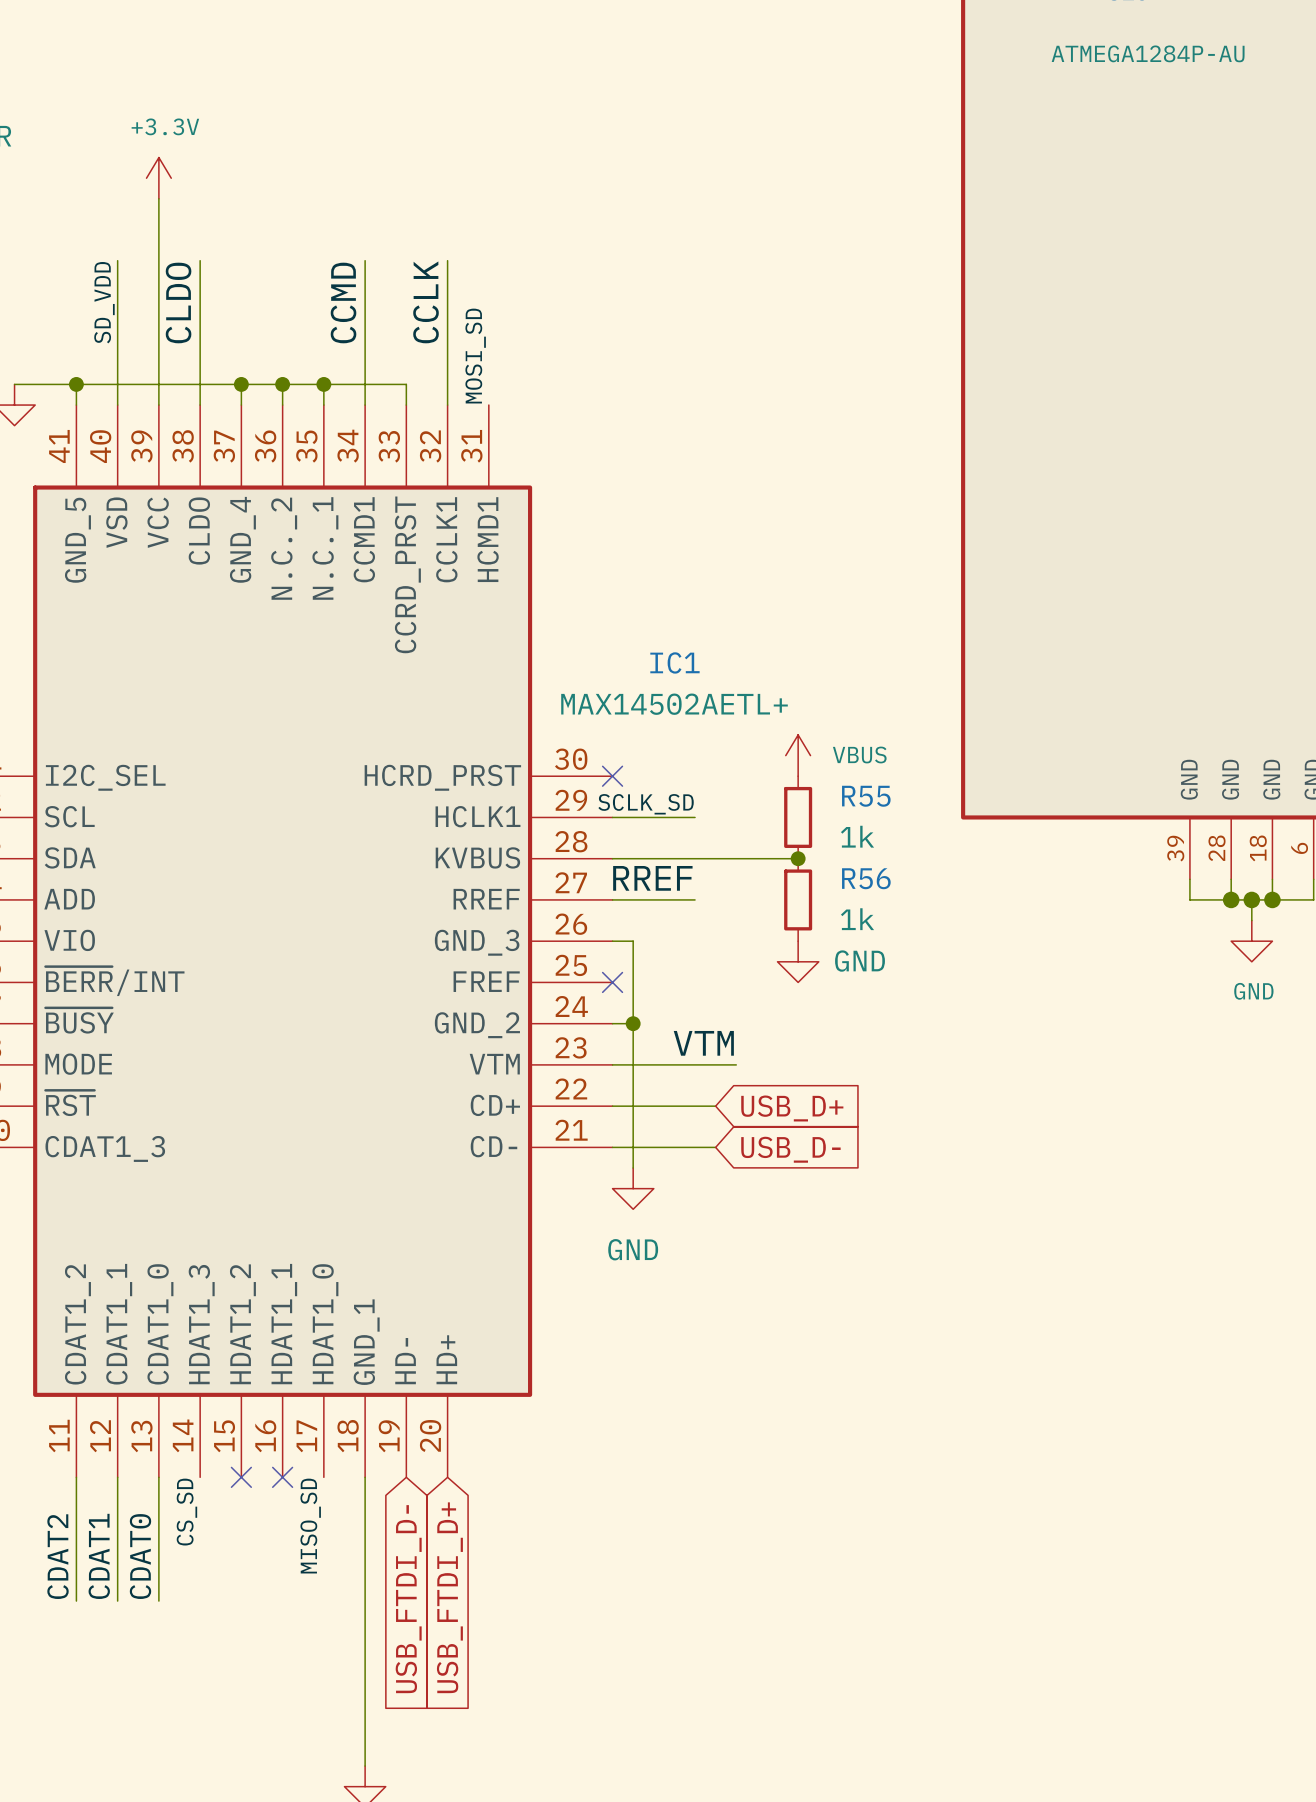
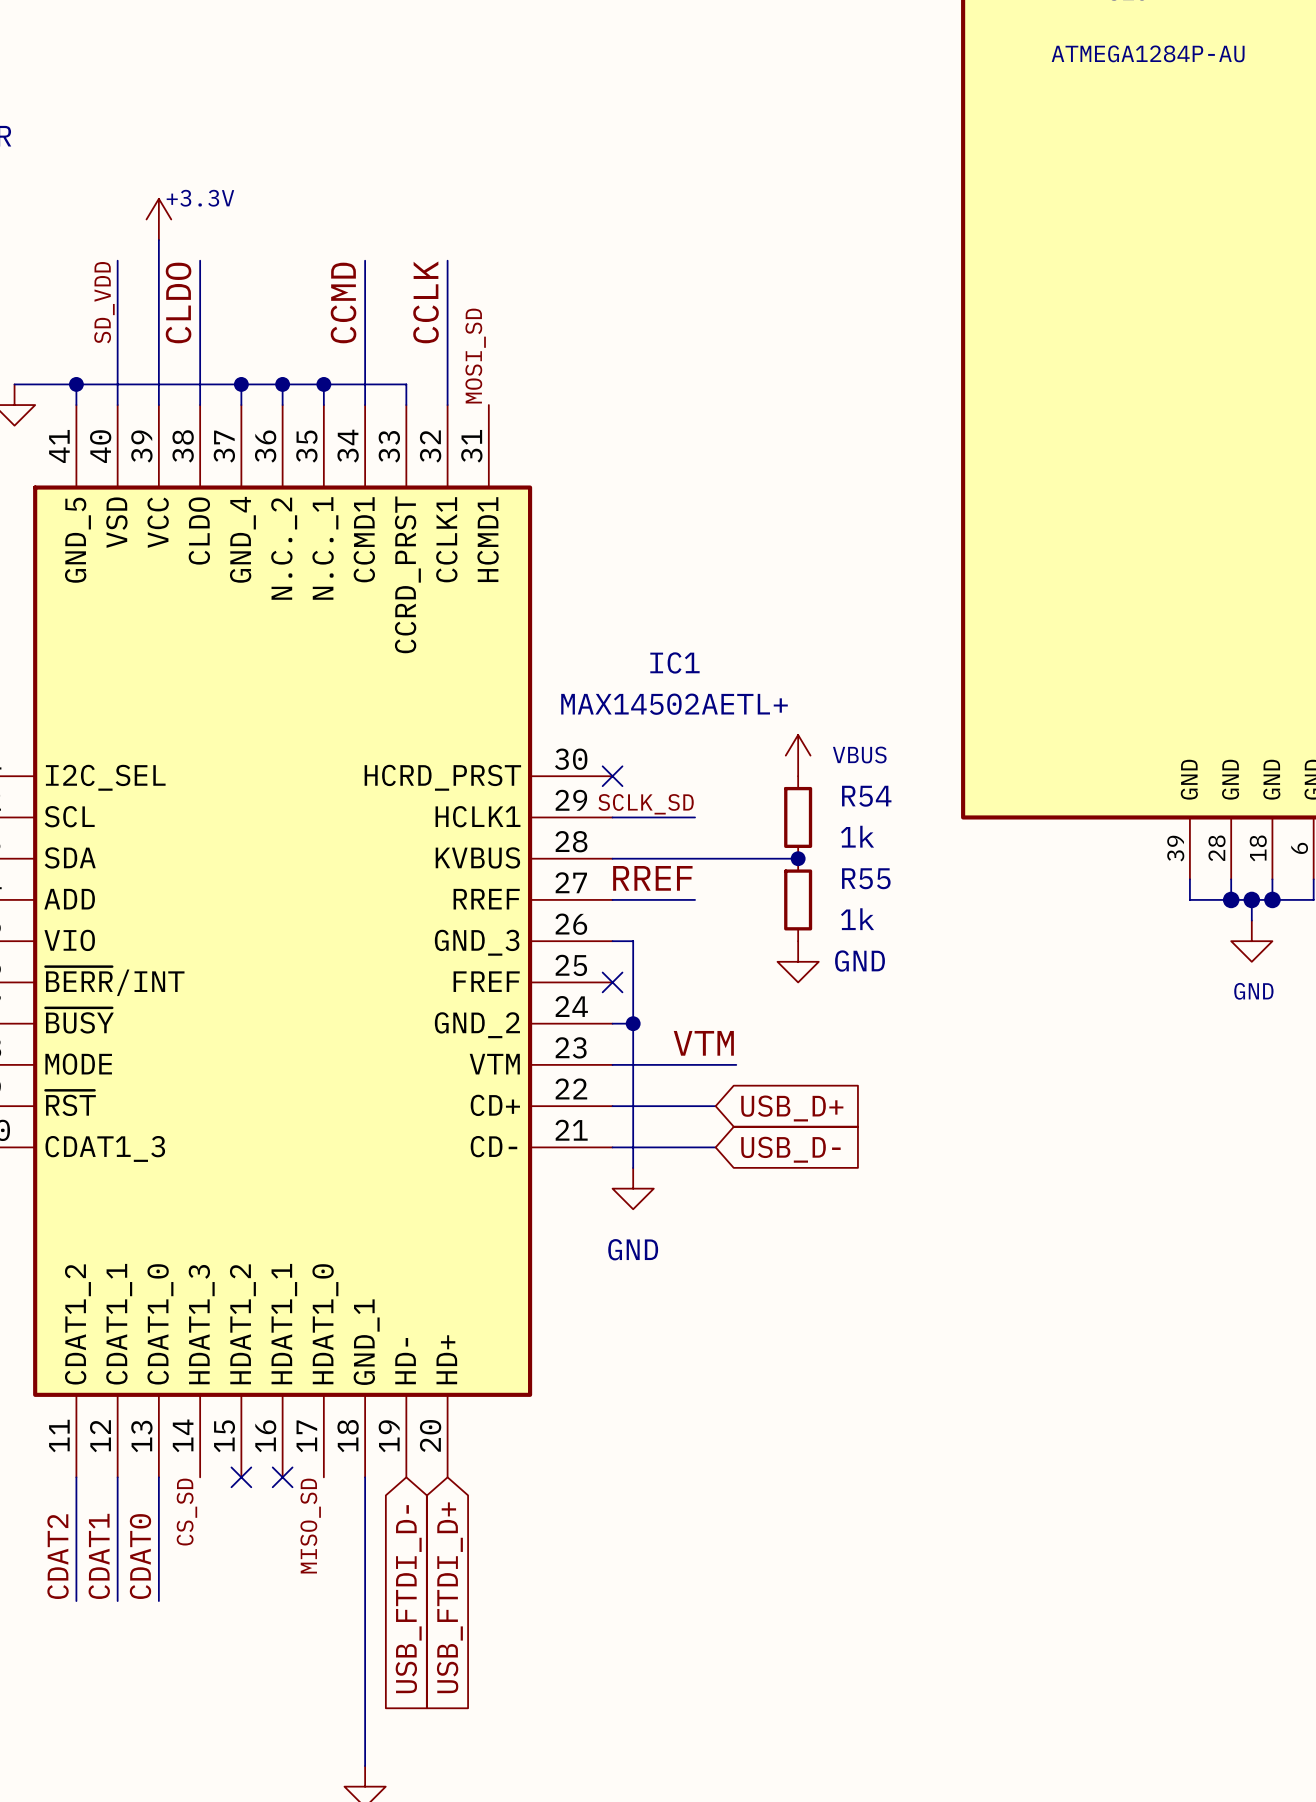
power symbol text position: +3.3V (165, 126) -> +3.3V (200, 198)
power symbol position: +3.3V (158, 178) -> +3.3V (158, 219)
R55 name: R55 (866, 796) -> R54 (866, 796)
R56 name: R56 (866, 878) -> R55 (866, 878)

